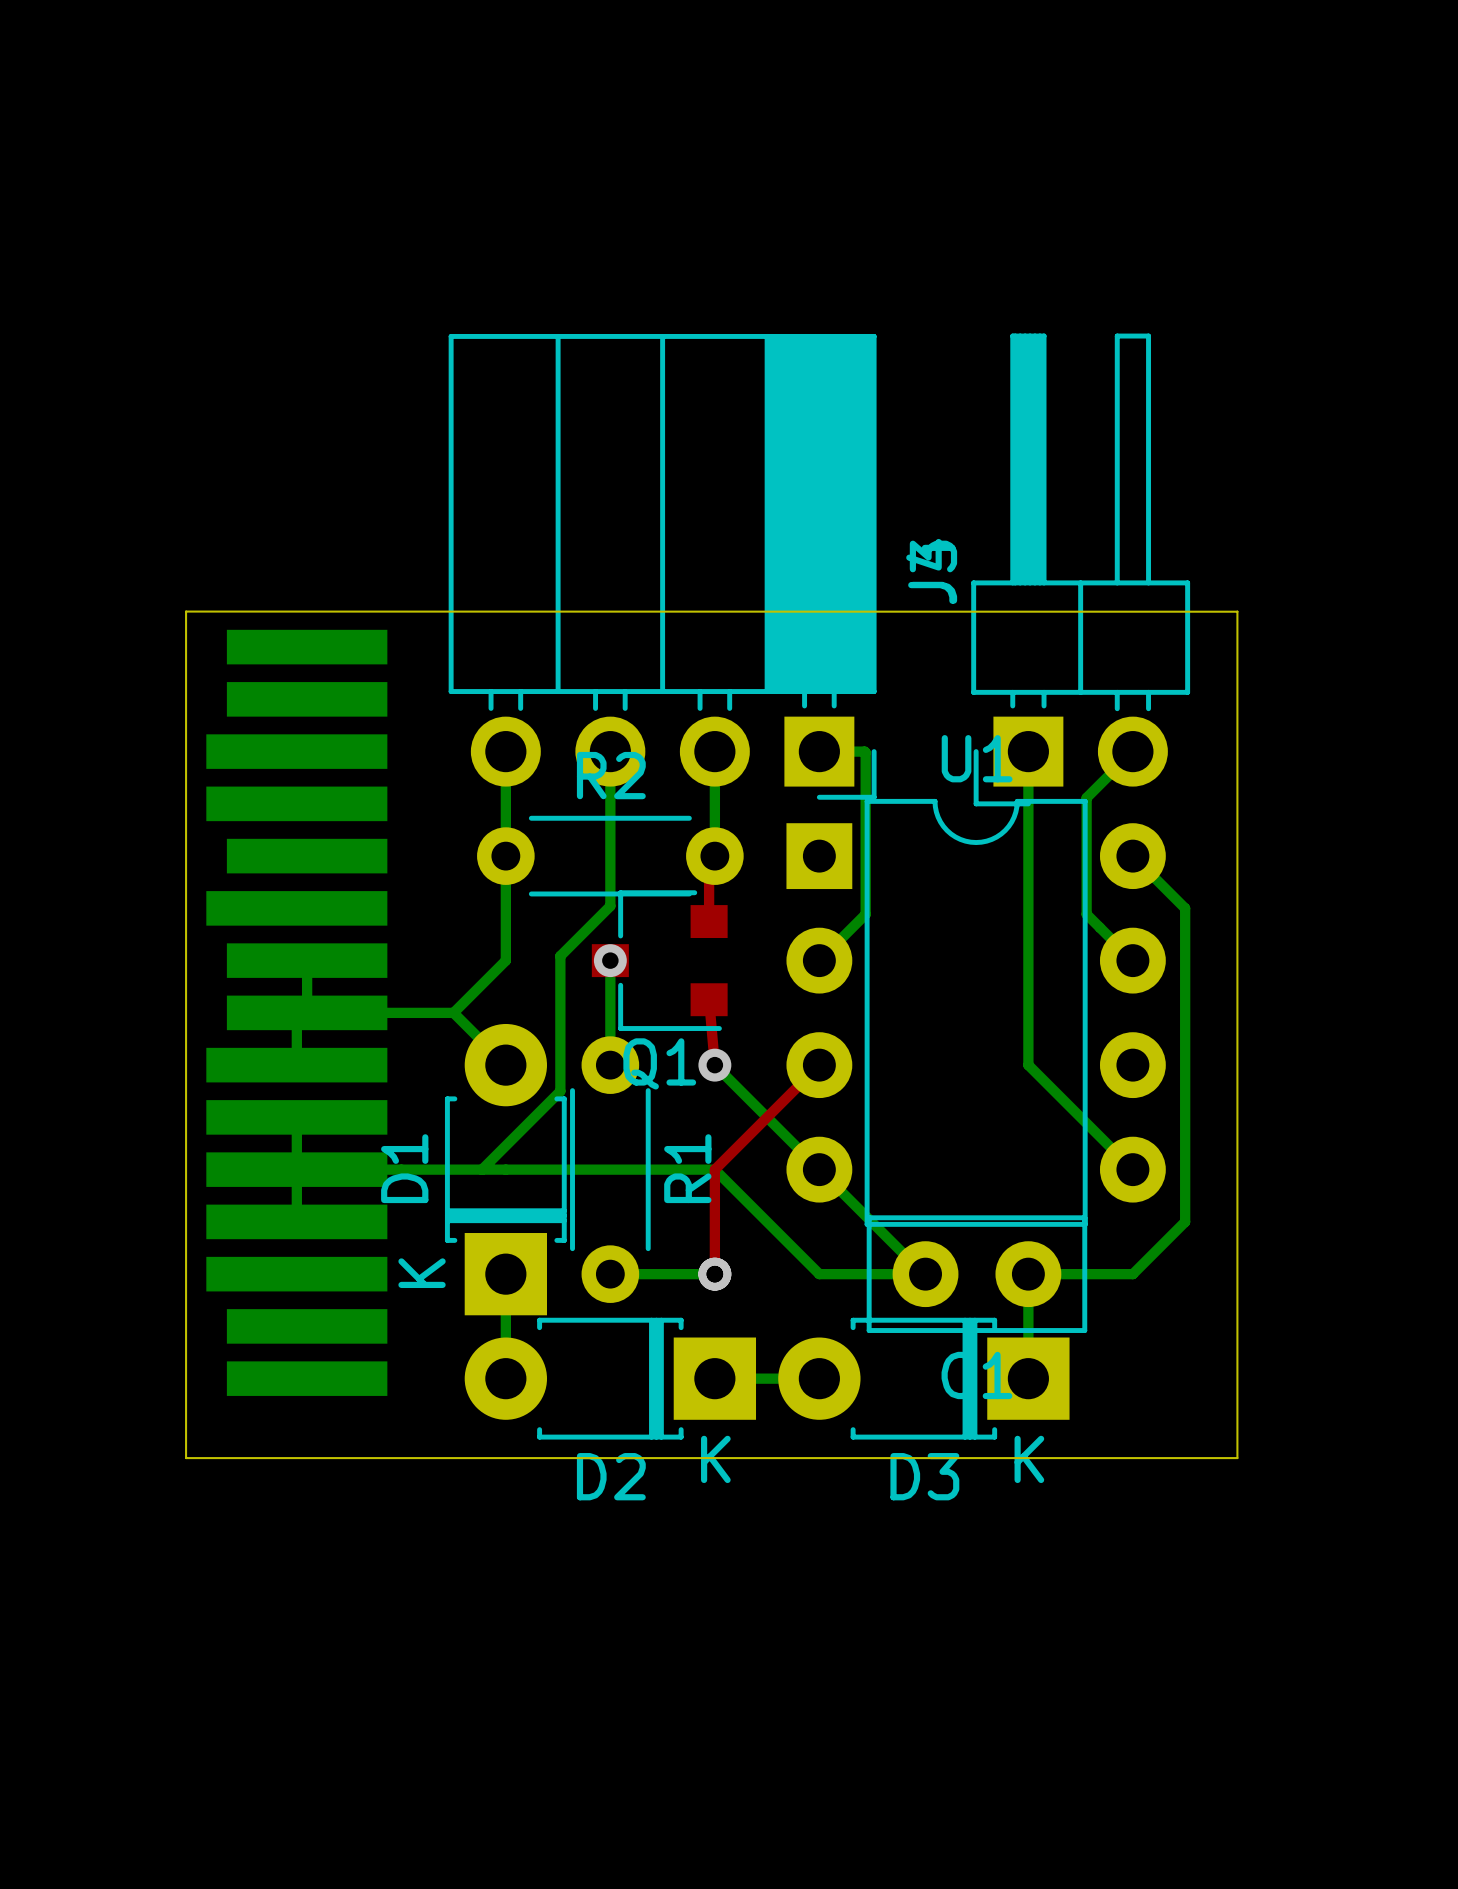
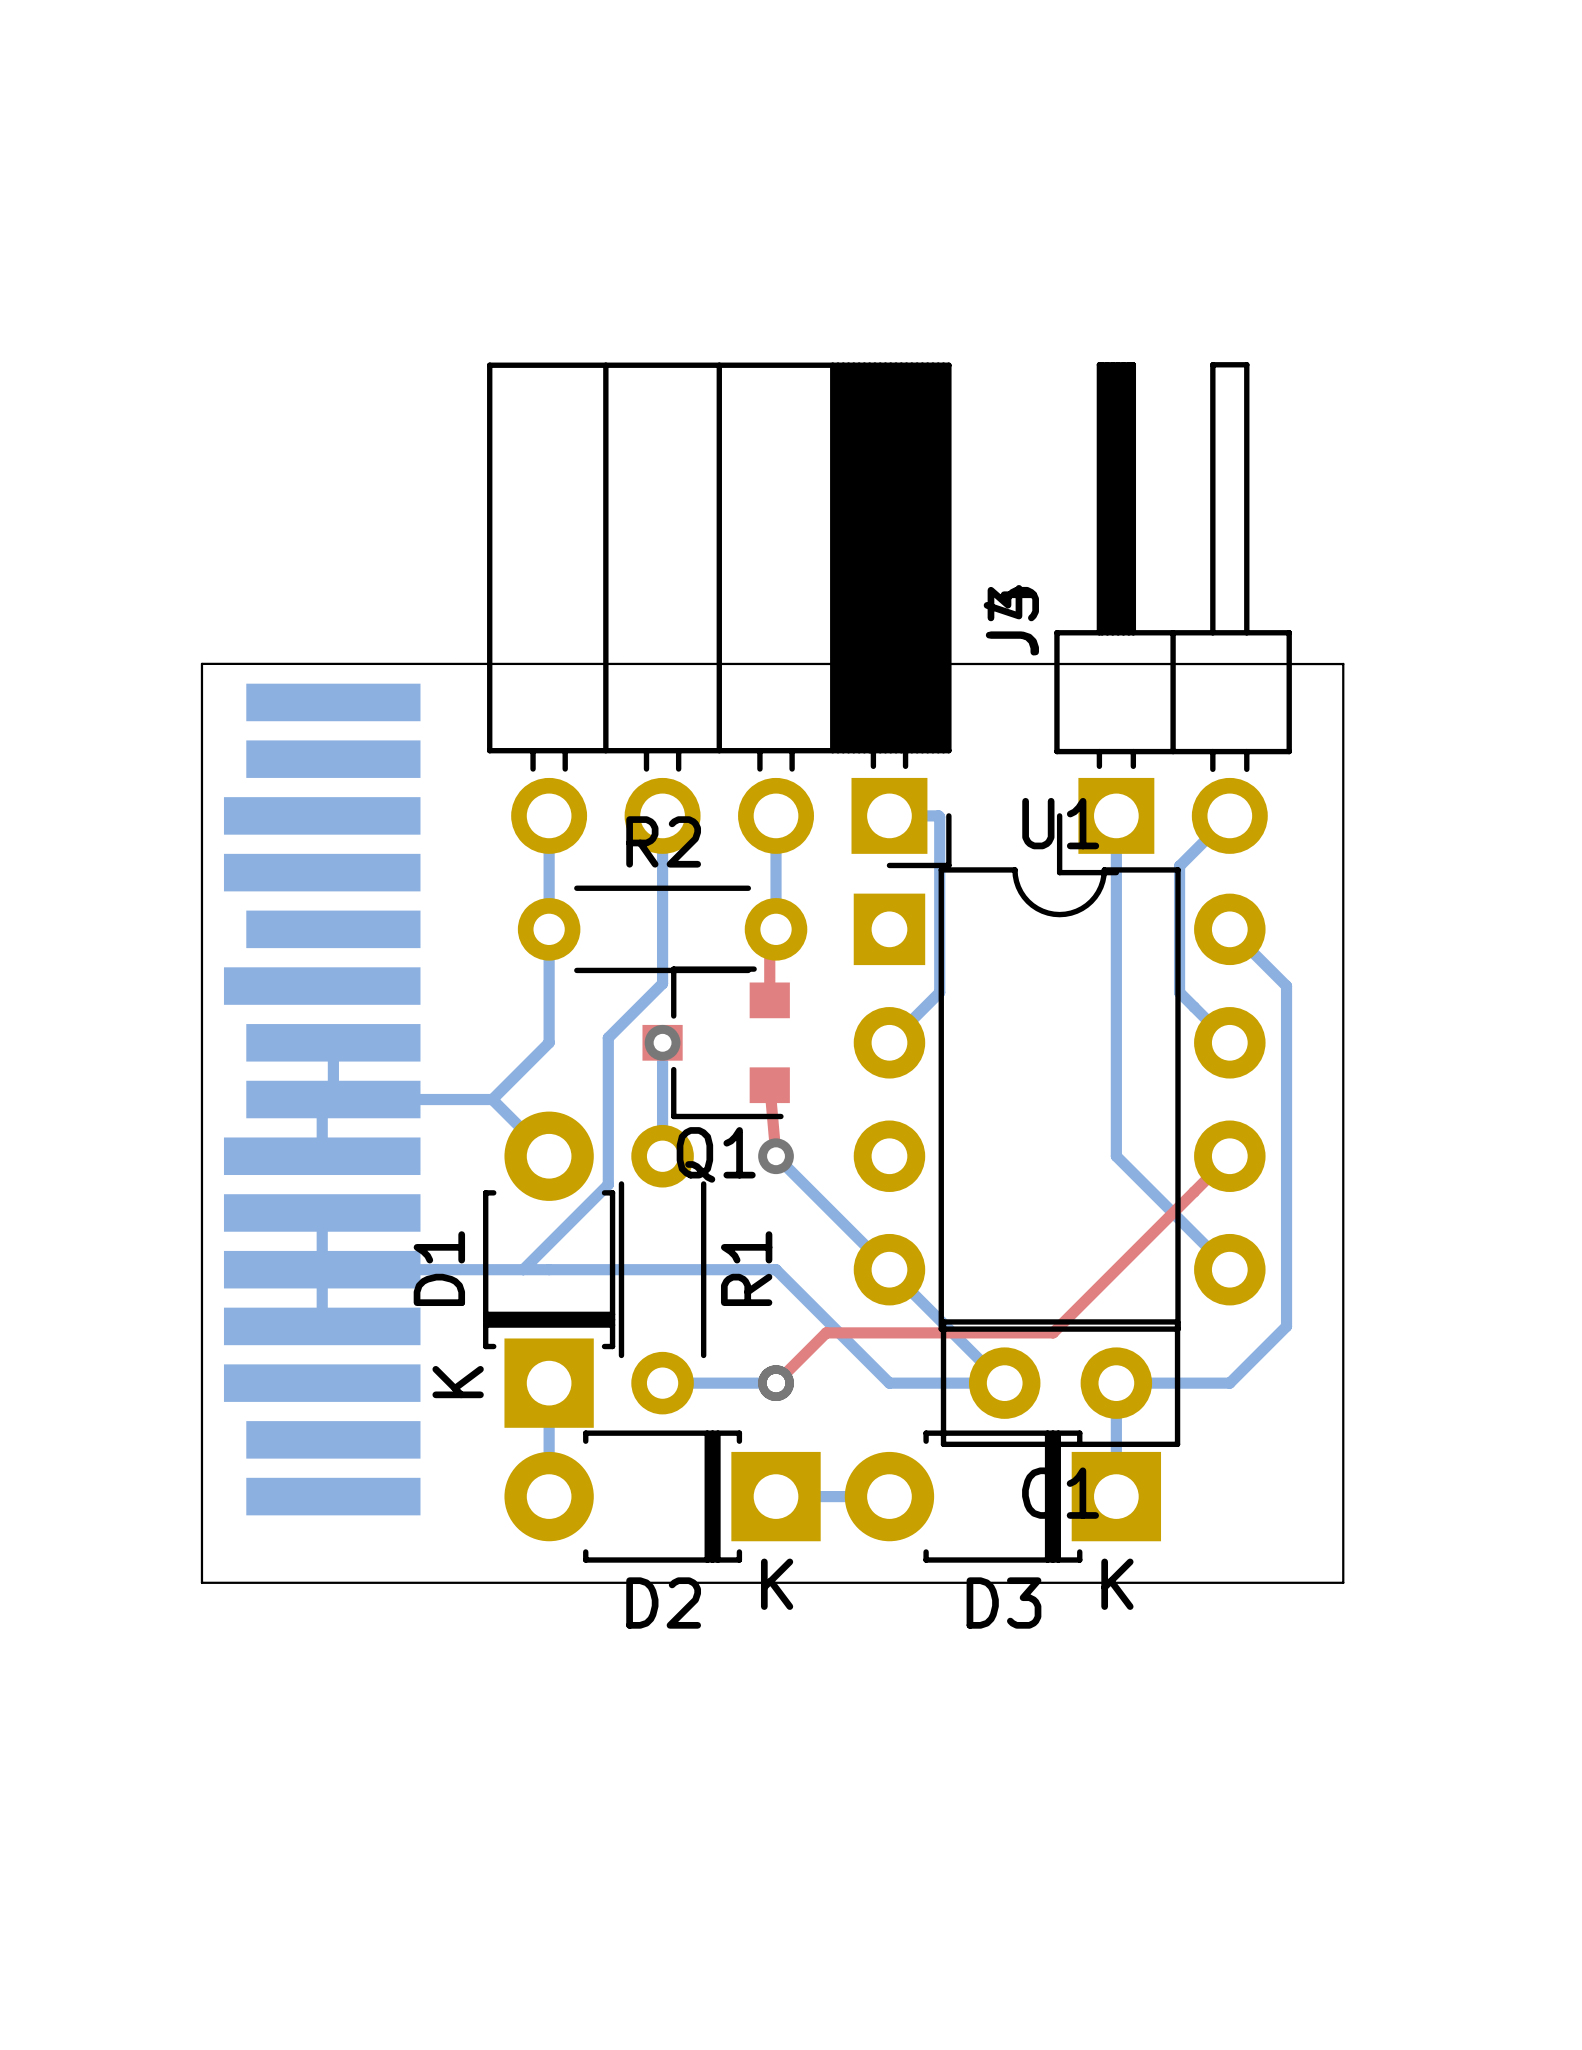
top track: (819, 1065) (714, 1169) (714, 1274) -> (1229, 1156) (1053, 1332) (826, 1332) (776, 1383)

